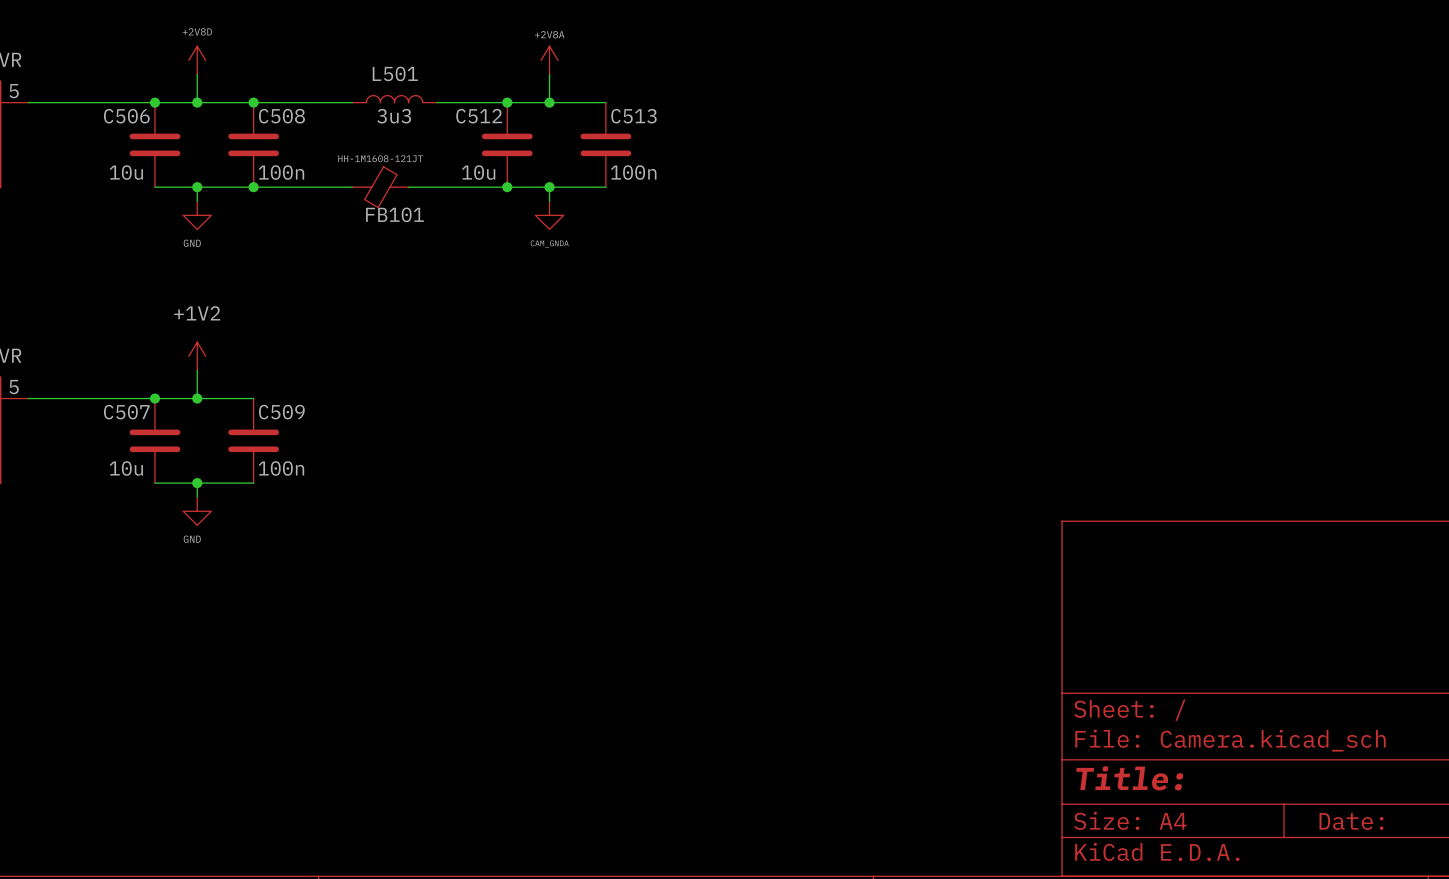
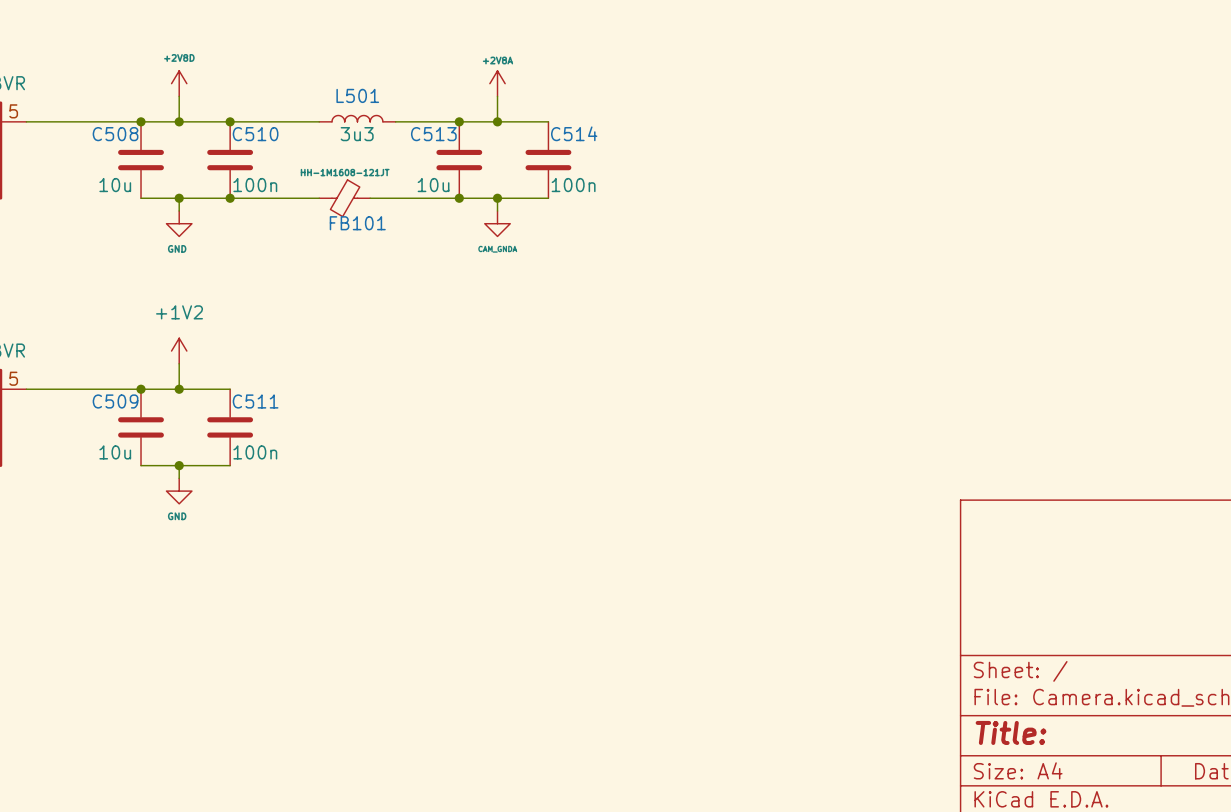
C506 name: C506 (126, 116) -> C508 (115, 134)
C508 name: C508 (281, 116) -> C510 (255, 134)
C512 name: C512 (479, 116) -> C513 (433, 134)
C513 name: C513 (633, 116) -> C514 (574, 133)
C507 name: C507 (126, 412) -> C509 (115, 401)
C509 name: C509 (281, 412) -> C511 (255, 401)

